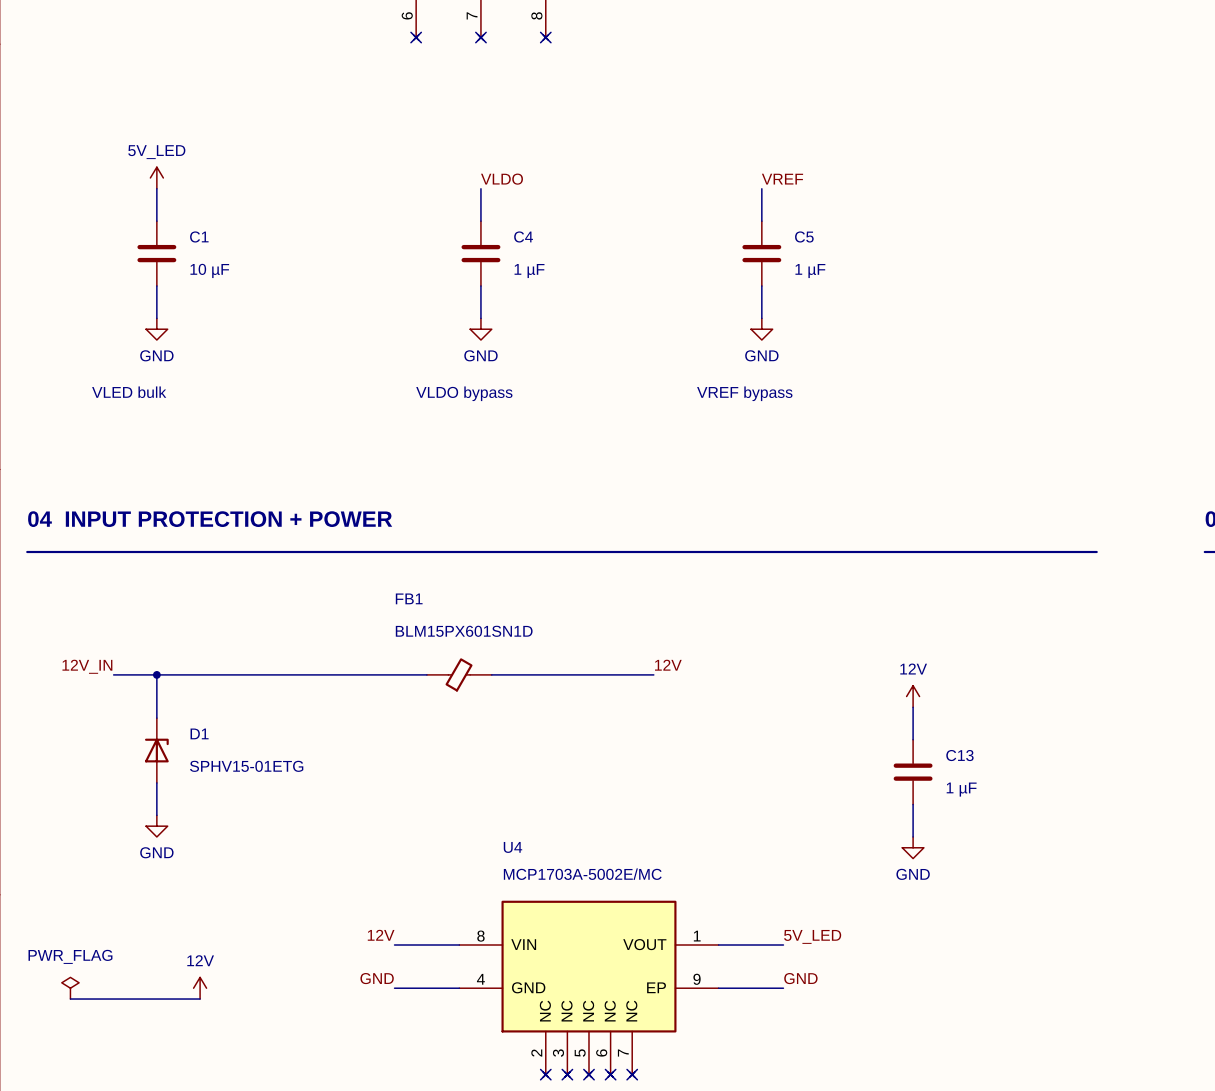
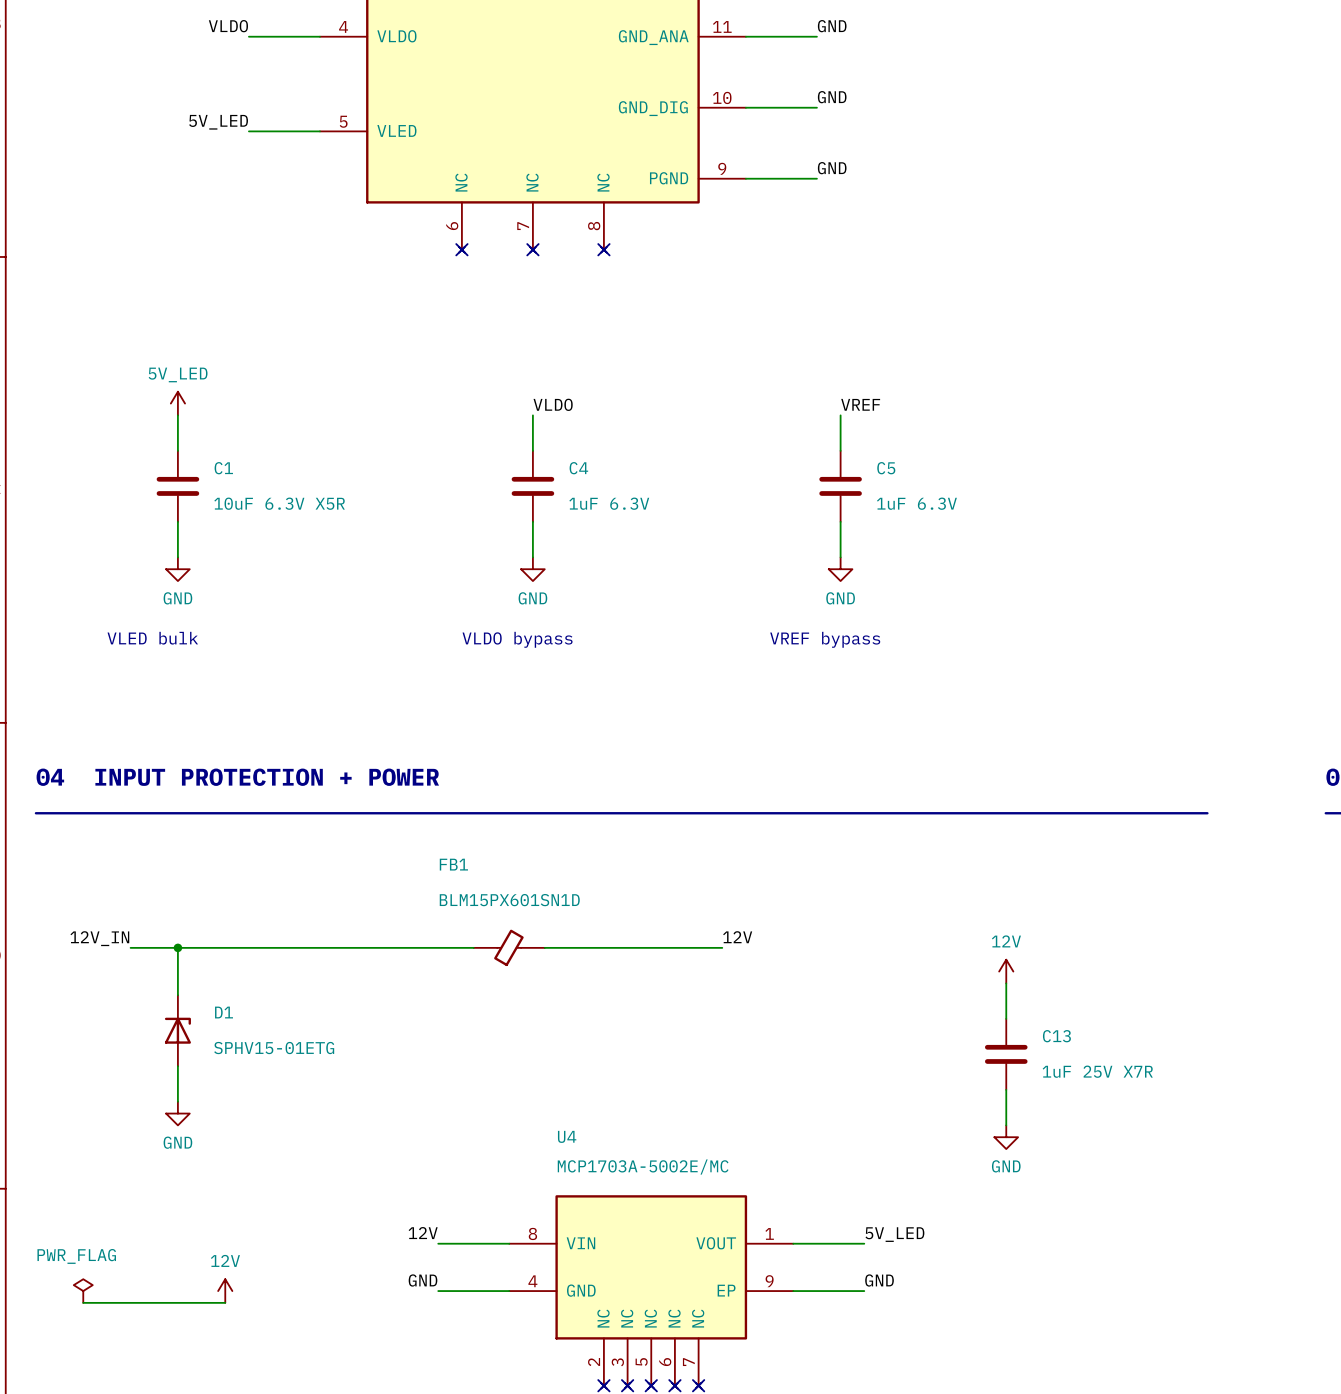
C1 value: 10 µF (209, 270) -> 10uF 6.3V X5R (279, 503)
C4 value: 1 µF (529, 271) -> 1uF 6.3V (609, 503)
C5 value: 1 µF (810, 271) -> 1uF 6.3V (916, 503)
C13 value: 1 µF (961, 789) -> 1uF 25V X7R (1097, 1071)

